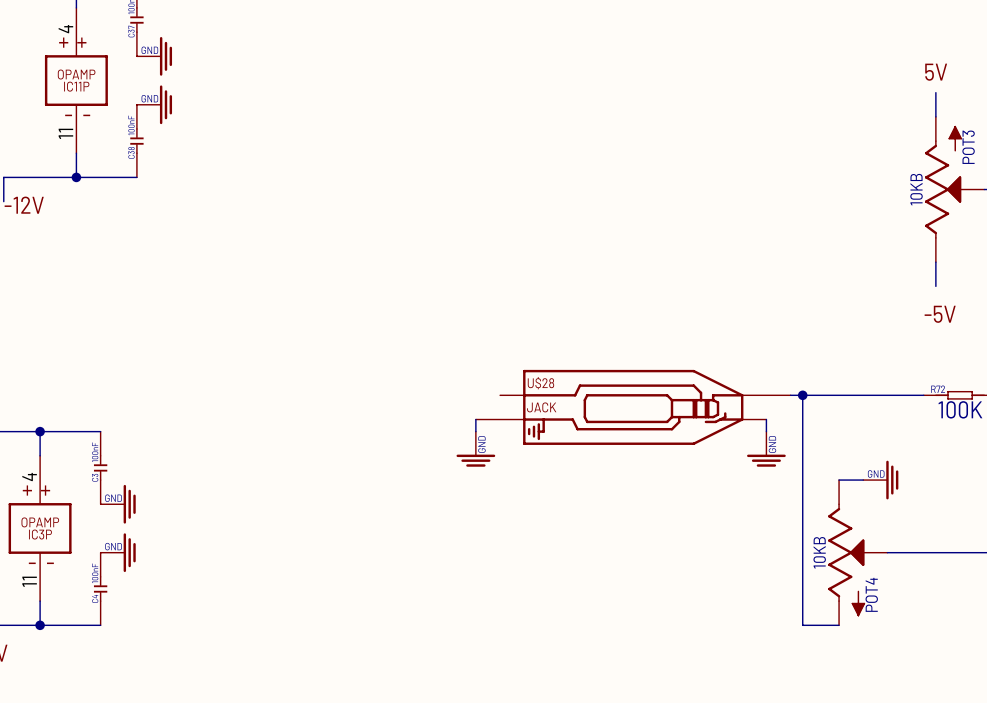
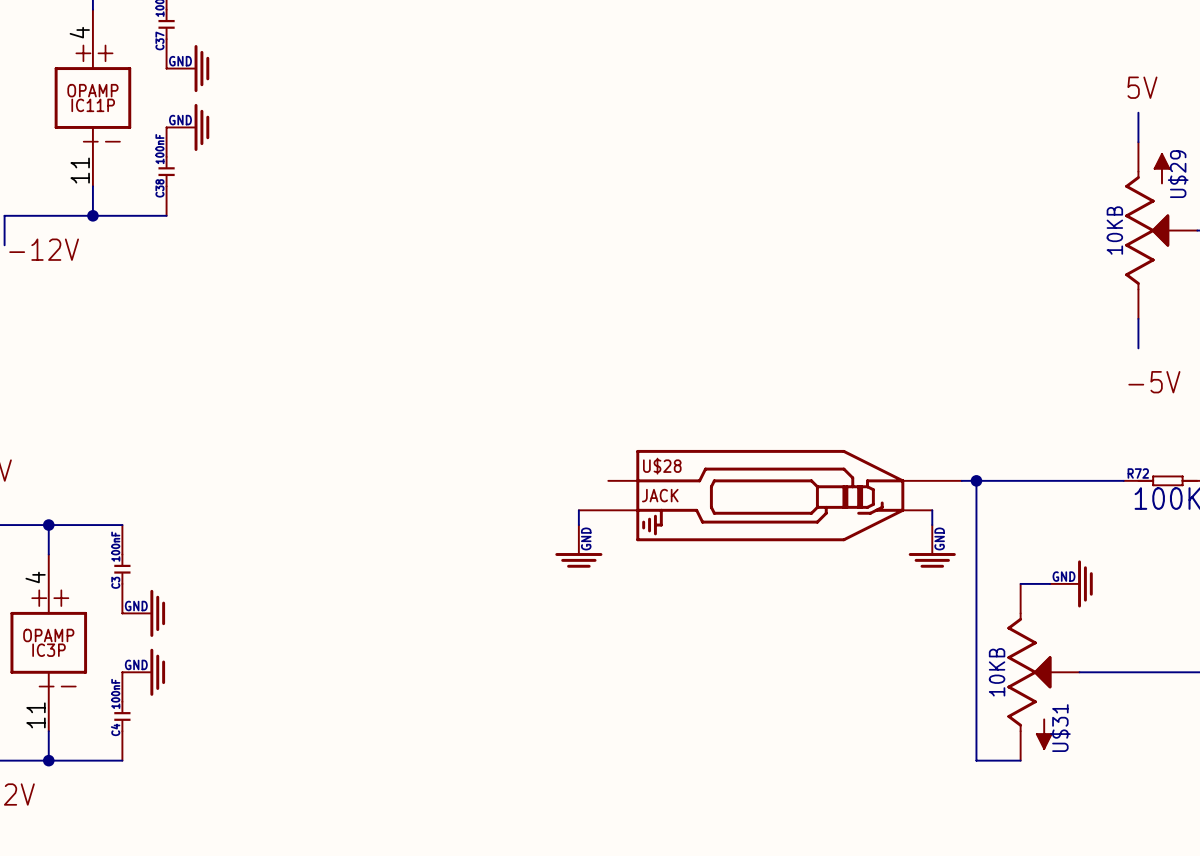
POT3 name: POT3 (968, 147) -> U$29 (1178, 174)
POT4 name: POT4 (871, 594) -> U$31 (1060, 728)

